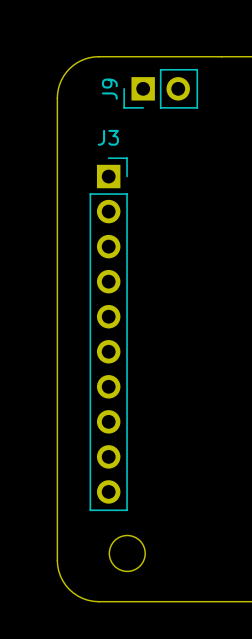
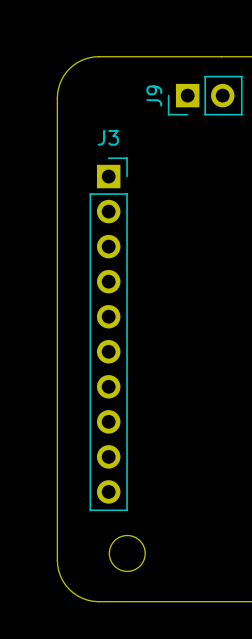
J9 position: (160, 88) -> (205, 95)

